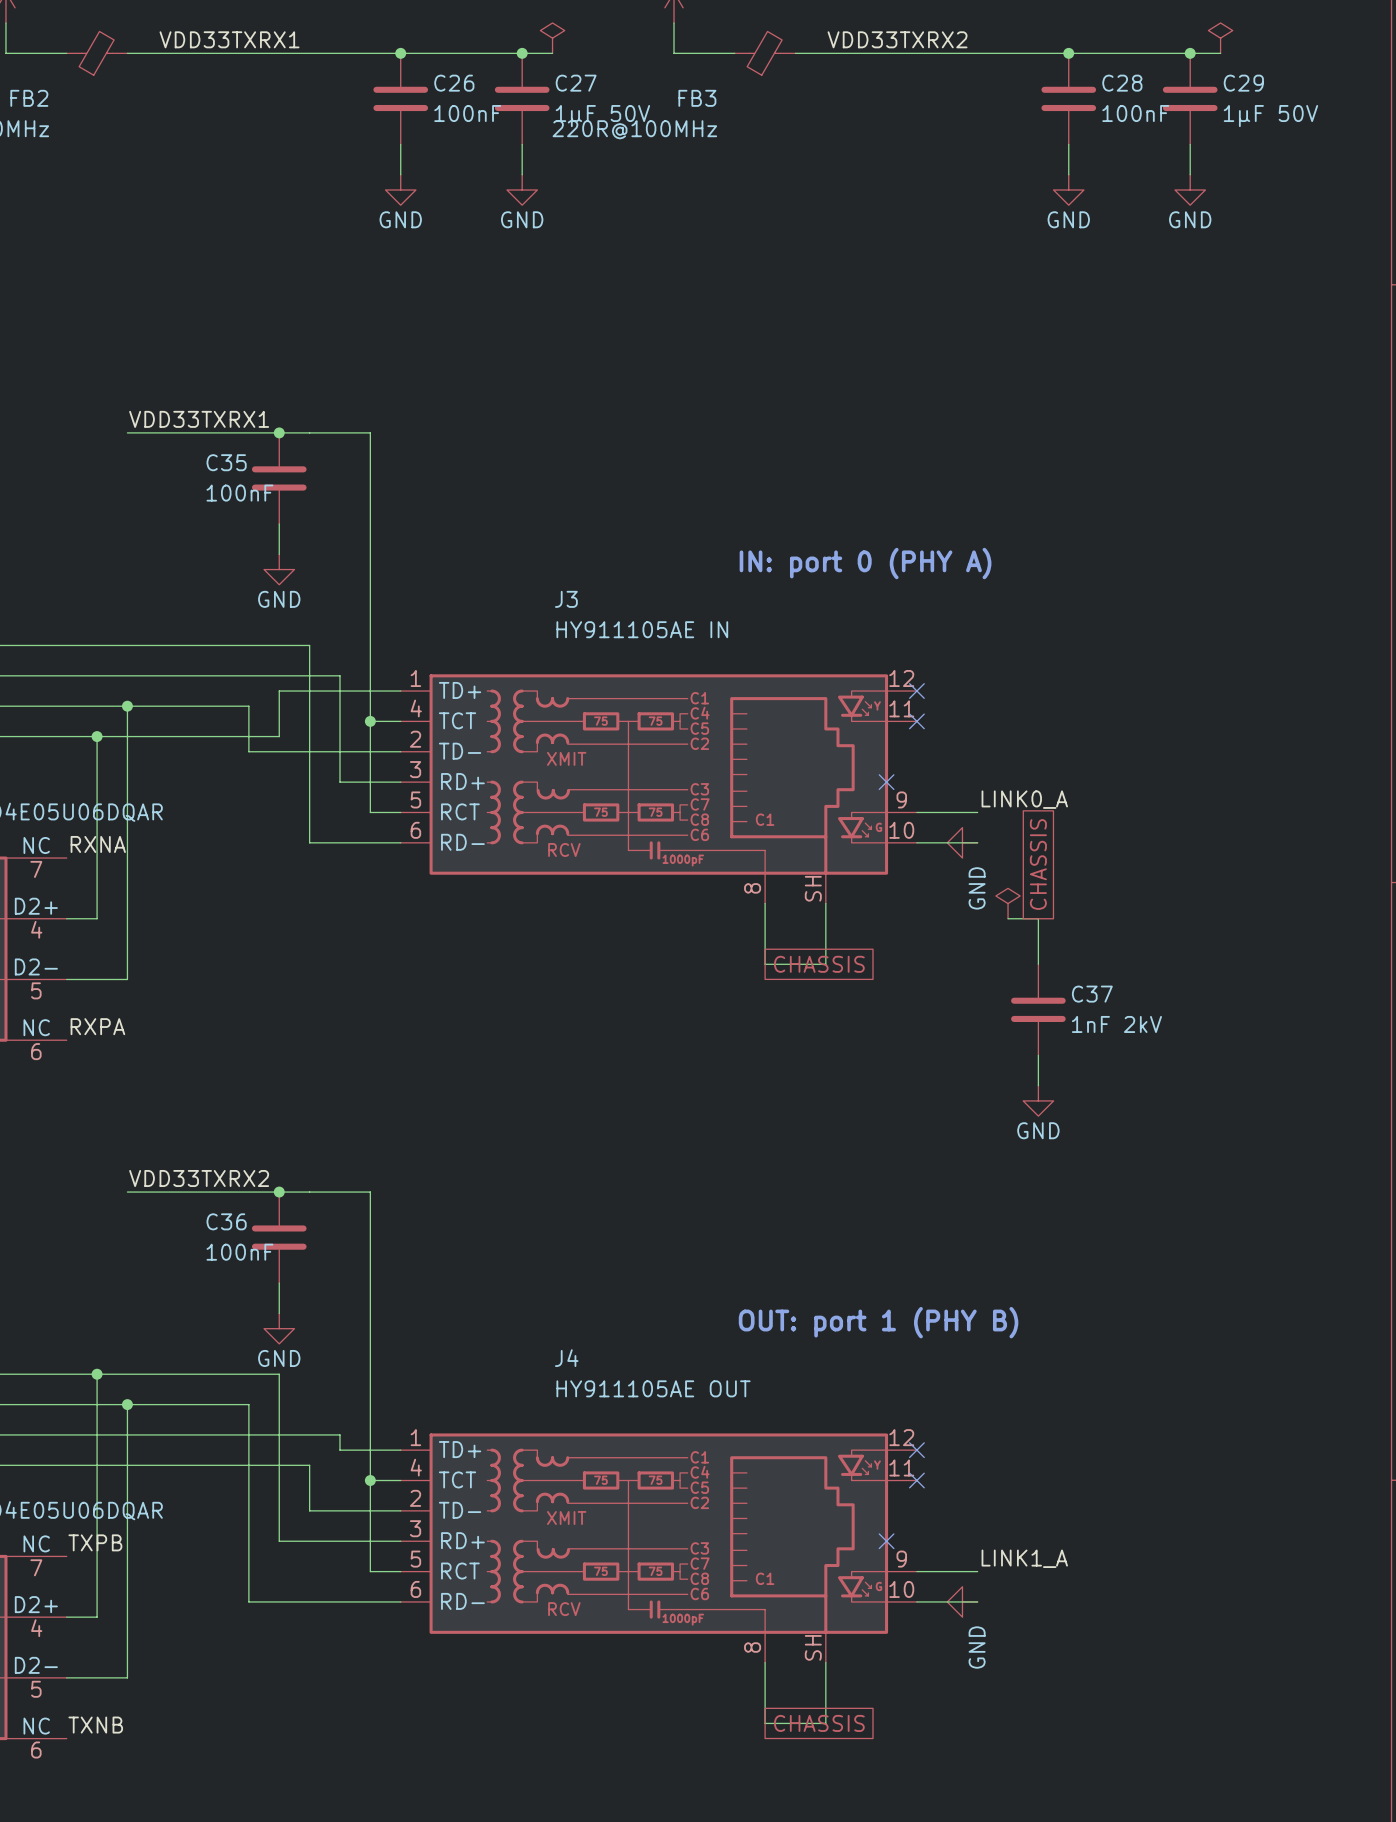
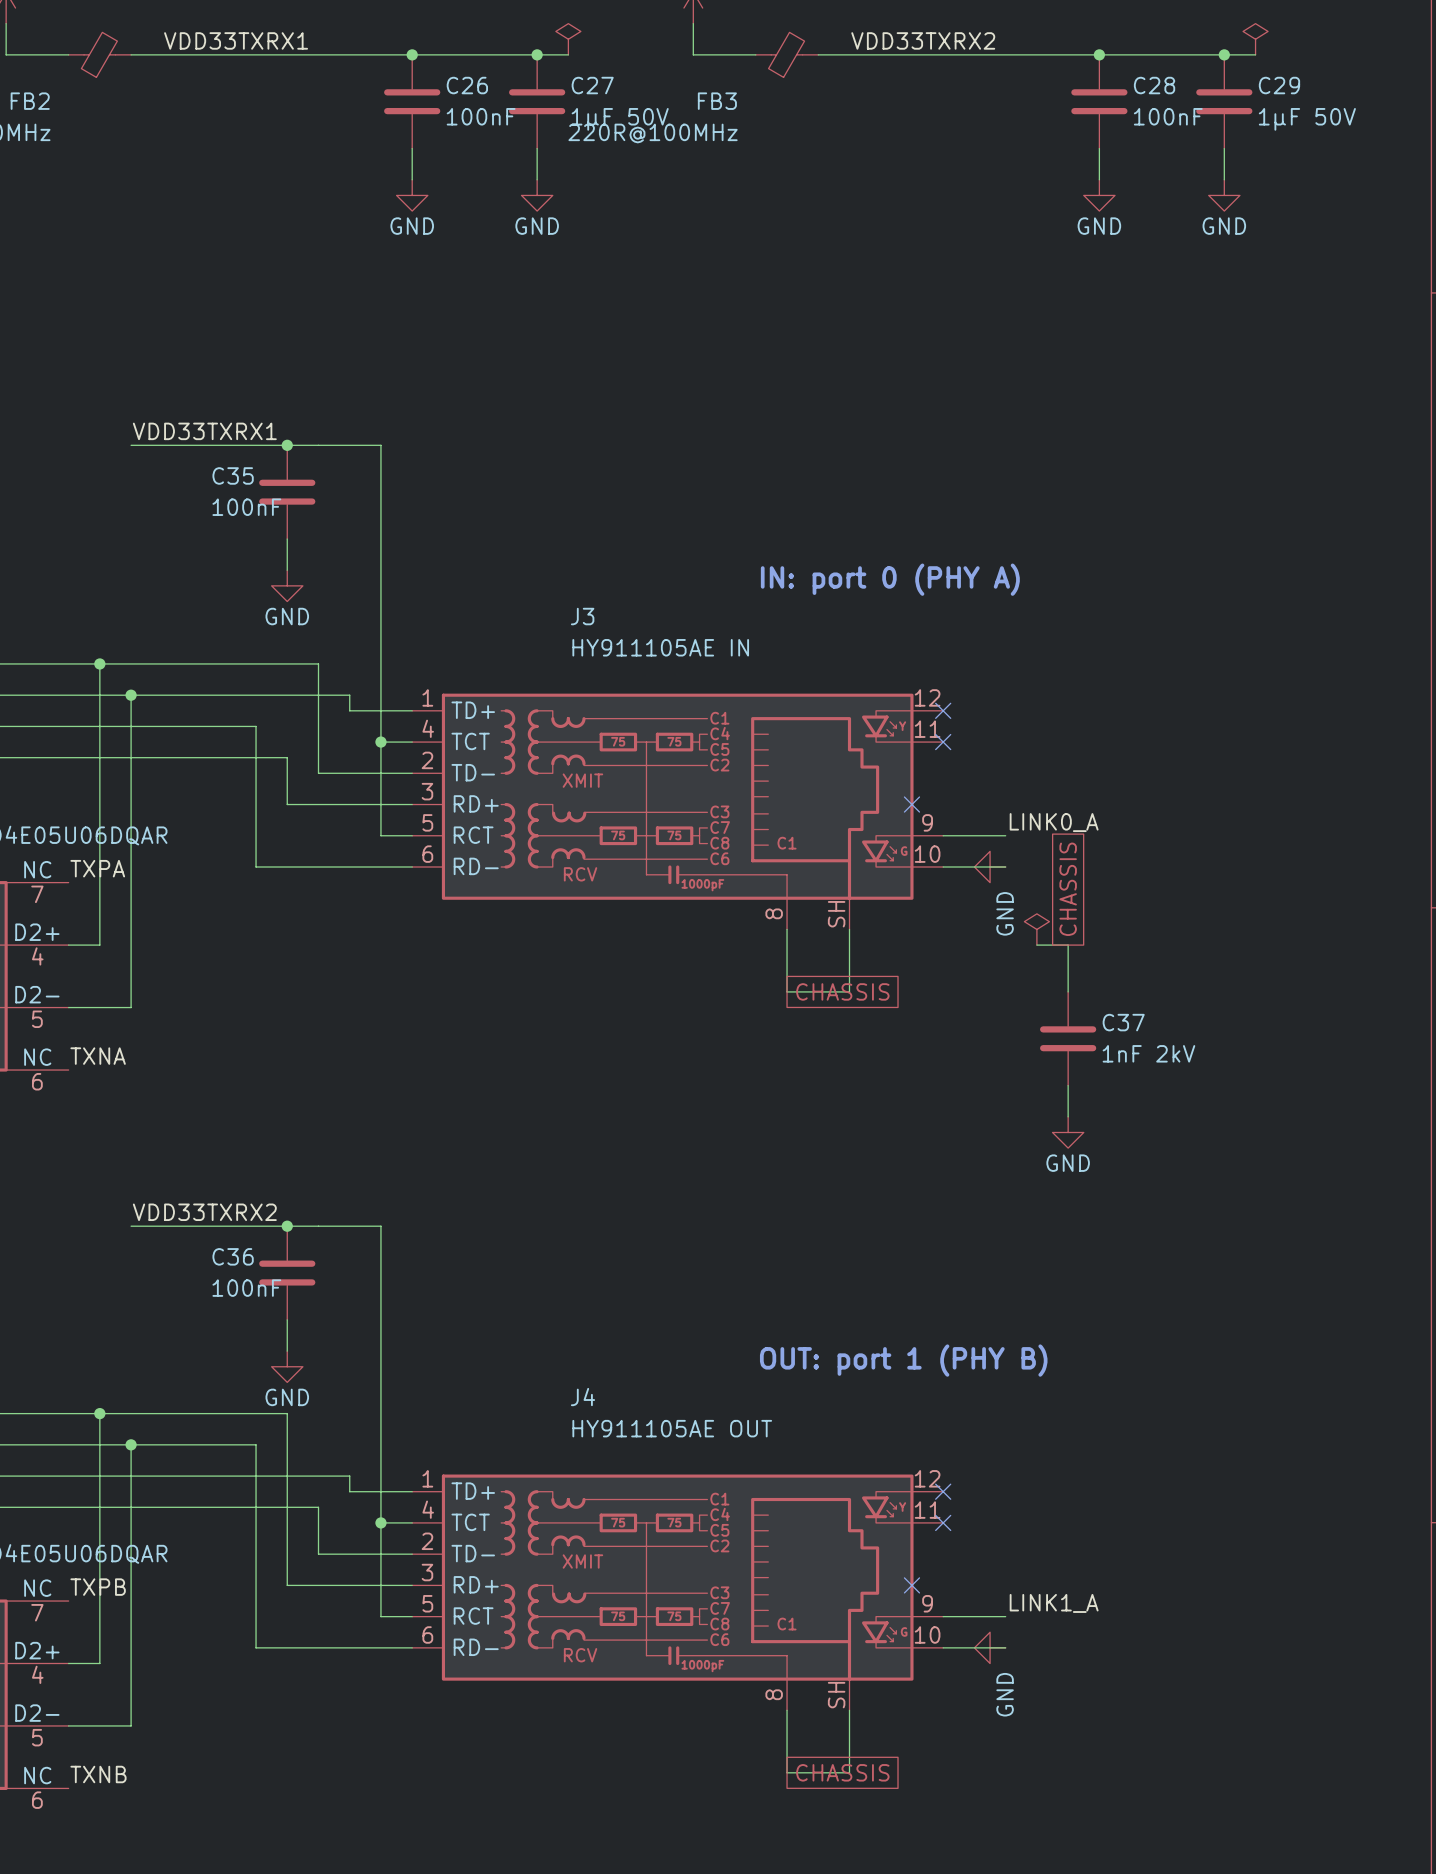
wire: none -> (99, 663) (99, 757)
junction: none -> (99, 663)
wire: none -> (131, 695) (131, 726)
junction position: (127, 706) -> (131, 695)
junction: (97, 736) -> none
wire: (279, 736) (279, 691) (339, 691) (339, 782) -> (287, 757) (287, 804) (349, 804)
wire: (248, 751) (309, 751) (309, 842) -> (256, 773) (256, 866) (318, 866)
label: RXNA (98, 844) -> TXPA (97, 868)
label: RXPA (97, 1026) -> TXNA (98, 1056)

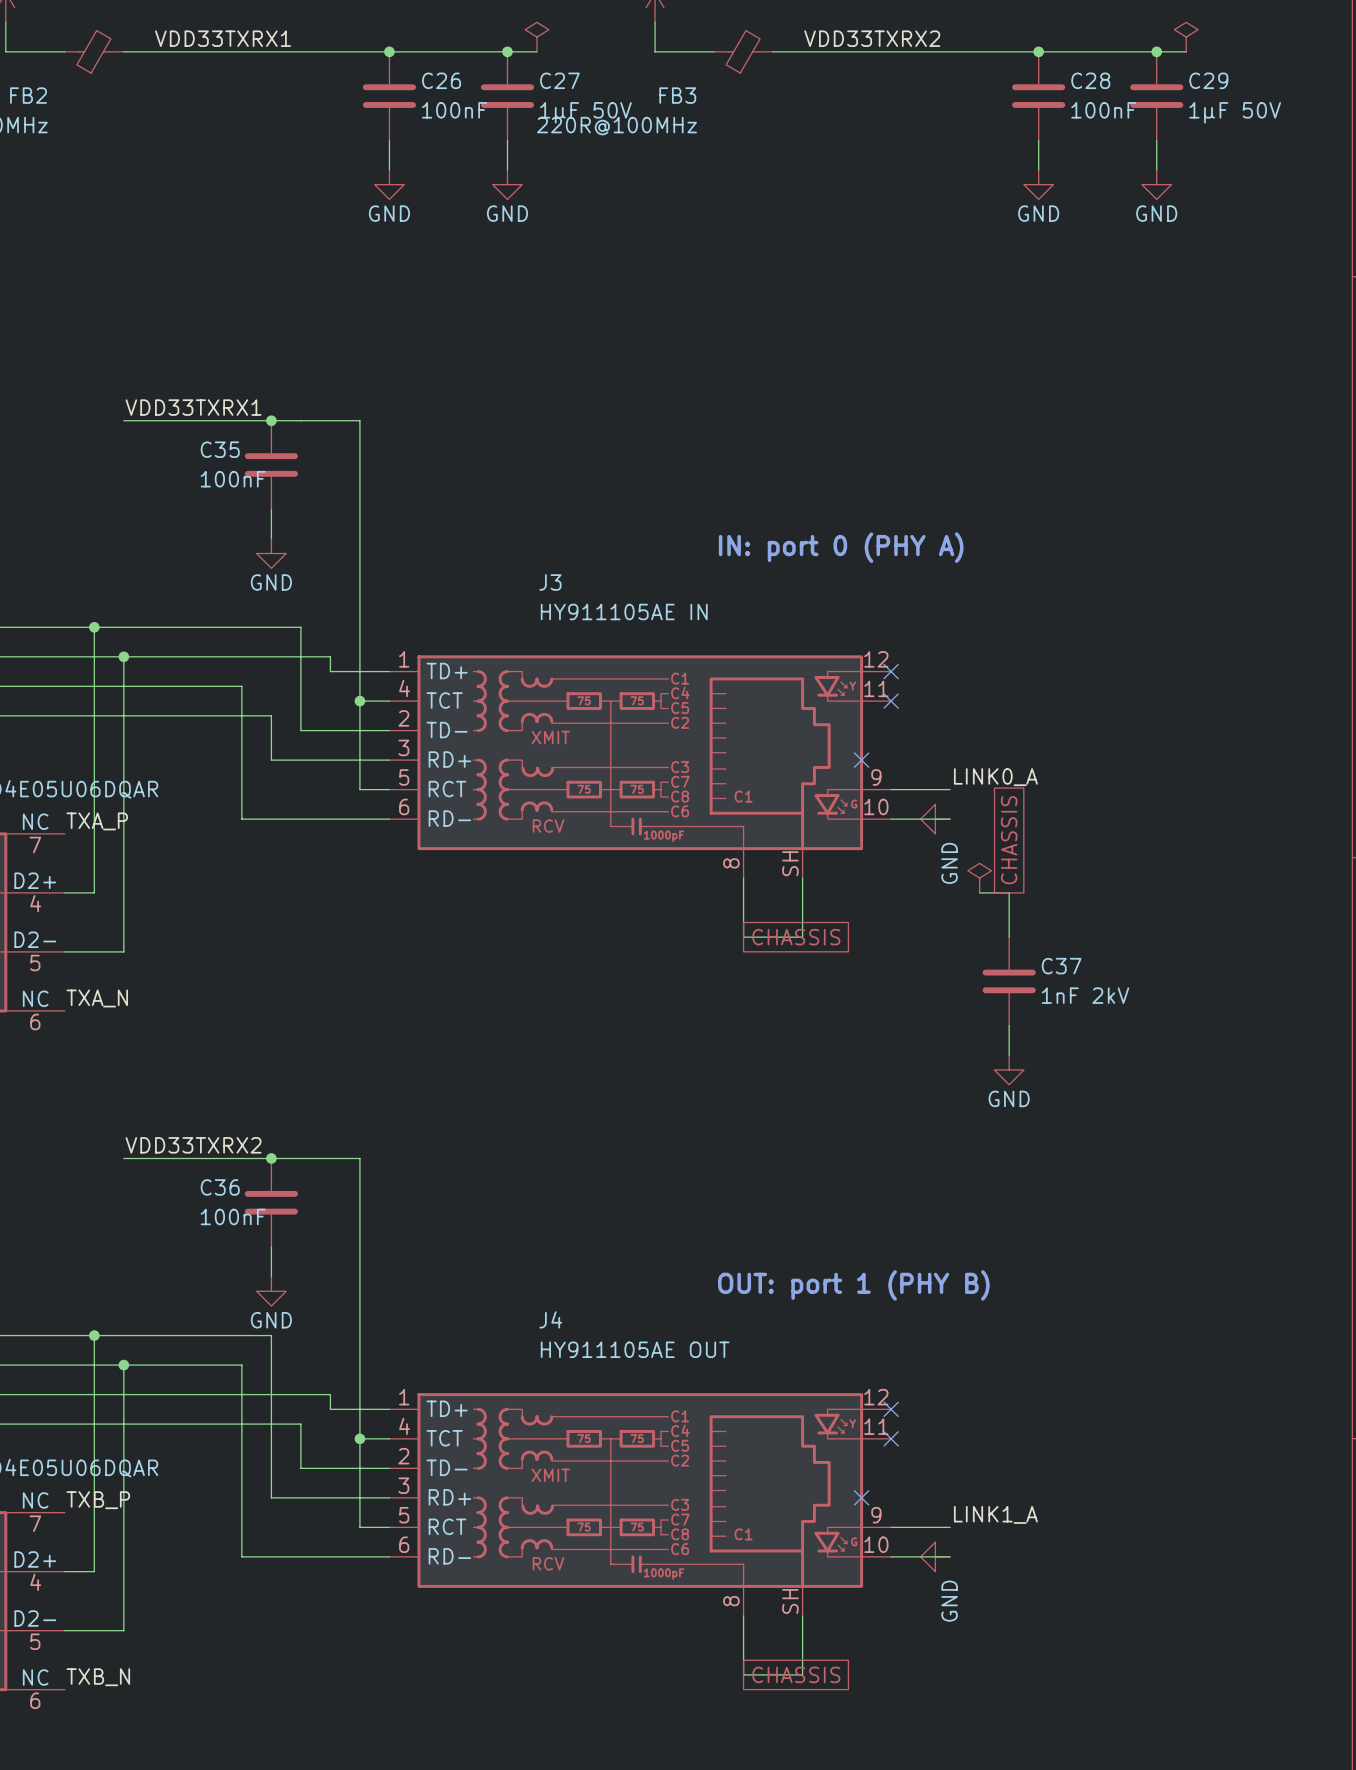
label: TXPA (97, 868) -> TXA_P (97, 821)
label: TXNA (98, 1056) -> TXA_N (97, 998)
label: TXPB (98, 1587) -> TXB_P (98, 1500)
label: TXNB (98, 1774) -> TXB_N (98, 1677)

